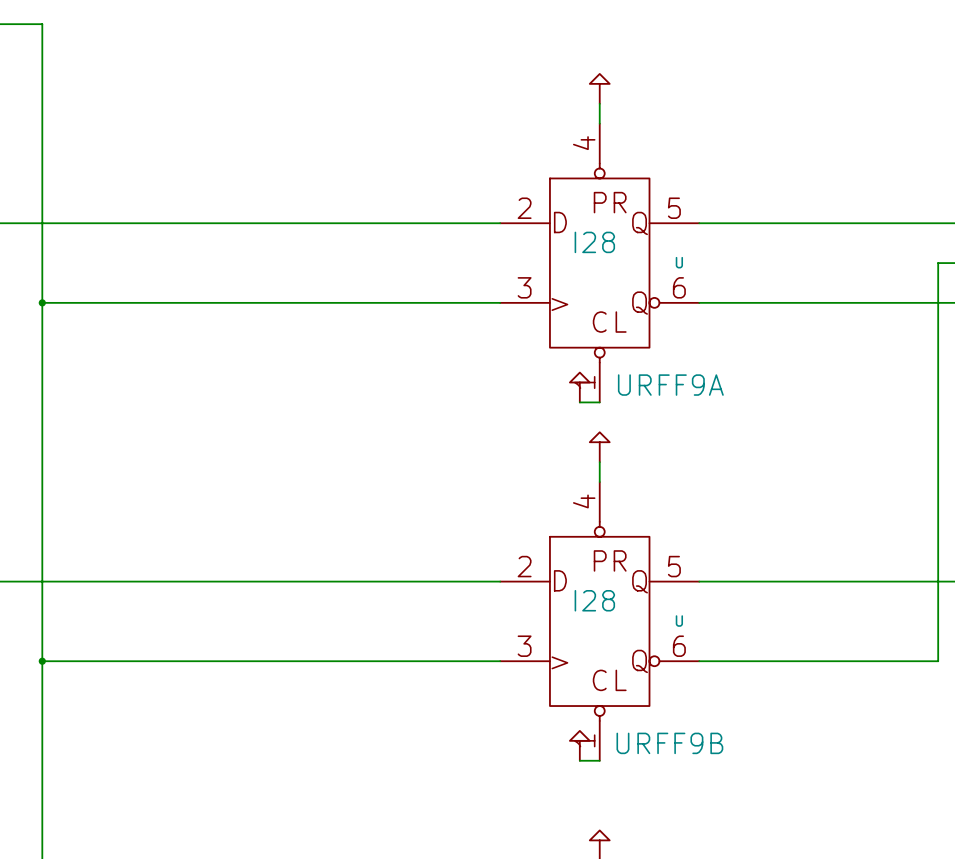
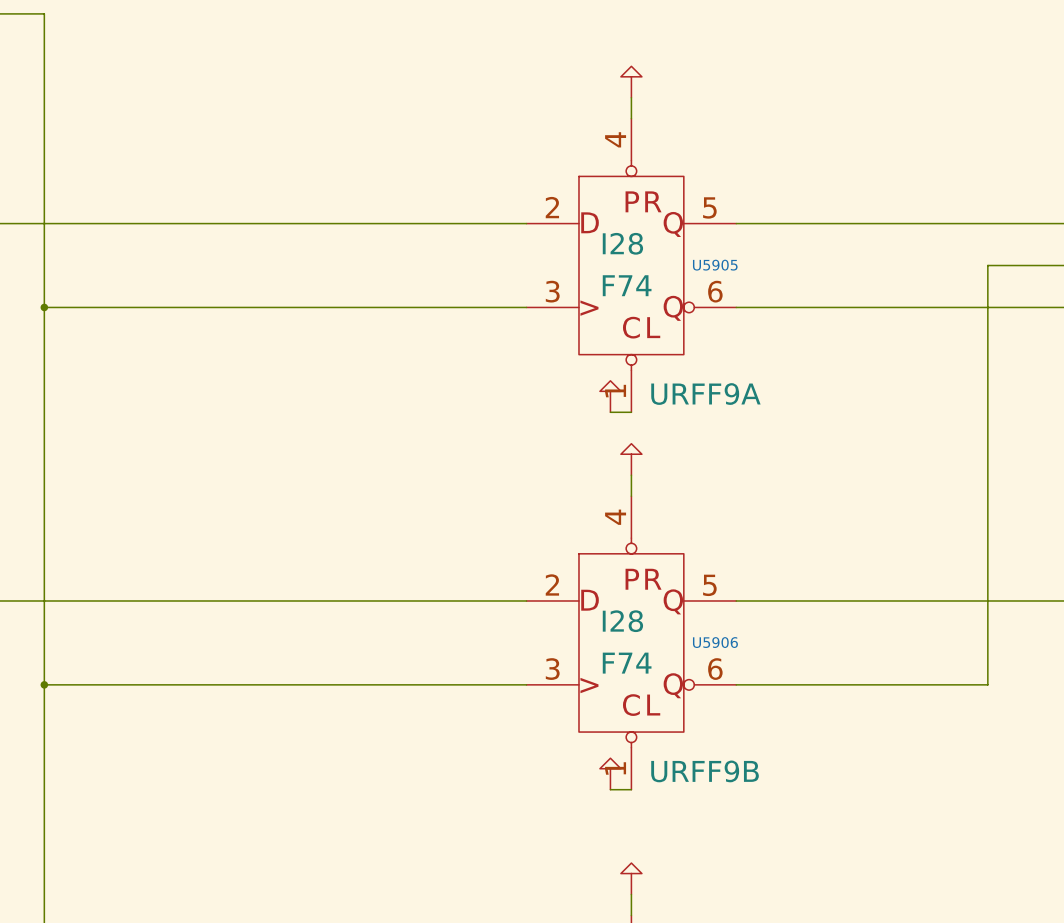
U name: U (679, 262) -> U5905 (715, 265)
U value: none -> F74 (627, 285)
U name: U (679, 621) -> U5906 (715, 642)
U value: none -> F74 (627, 663)

